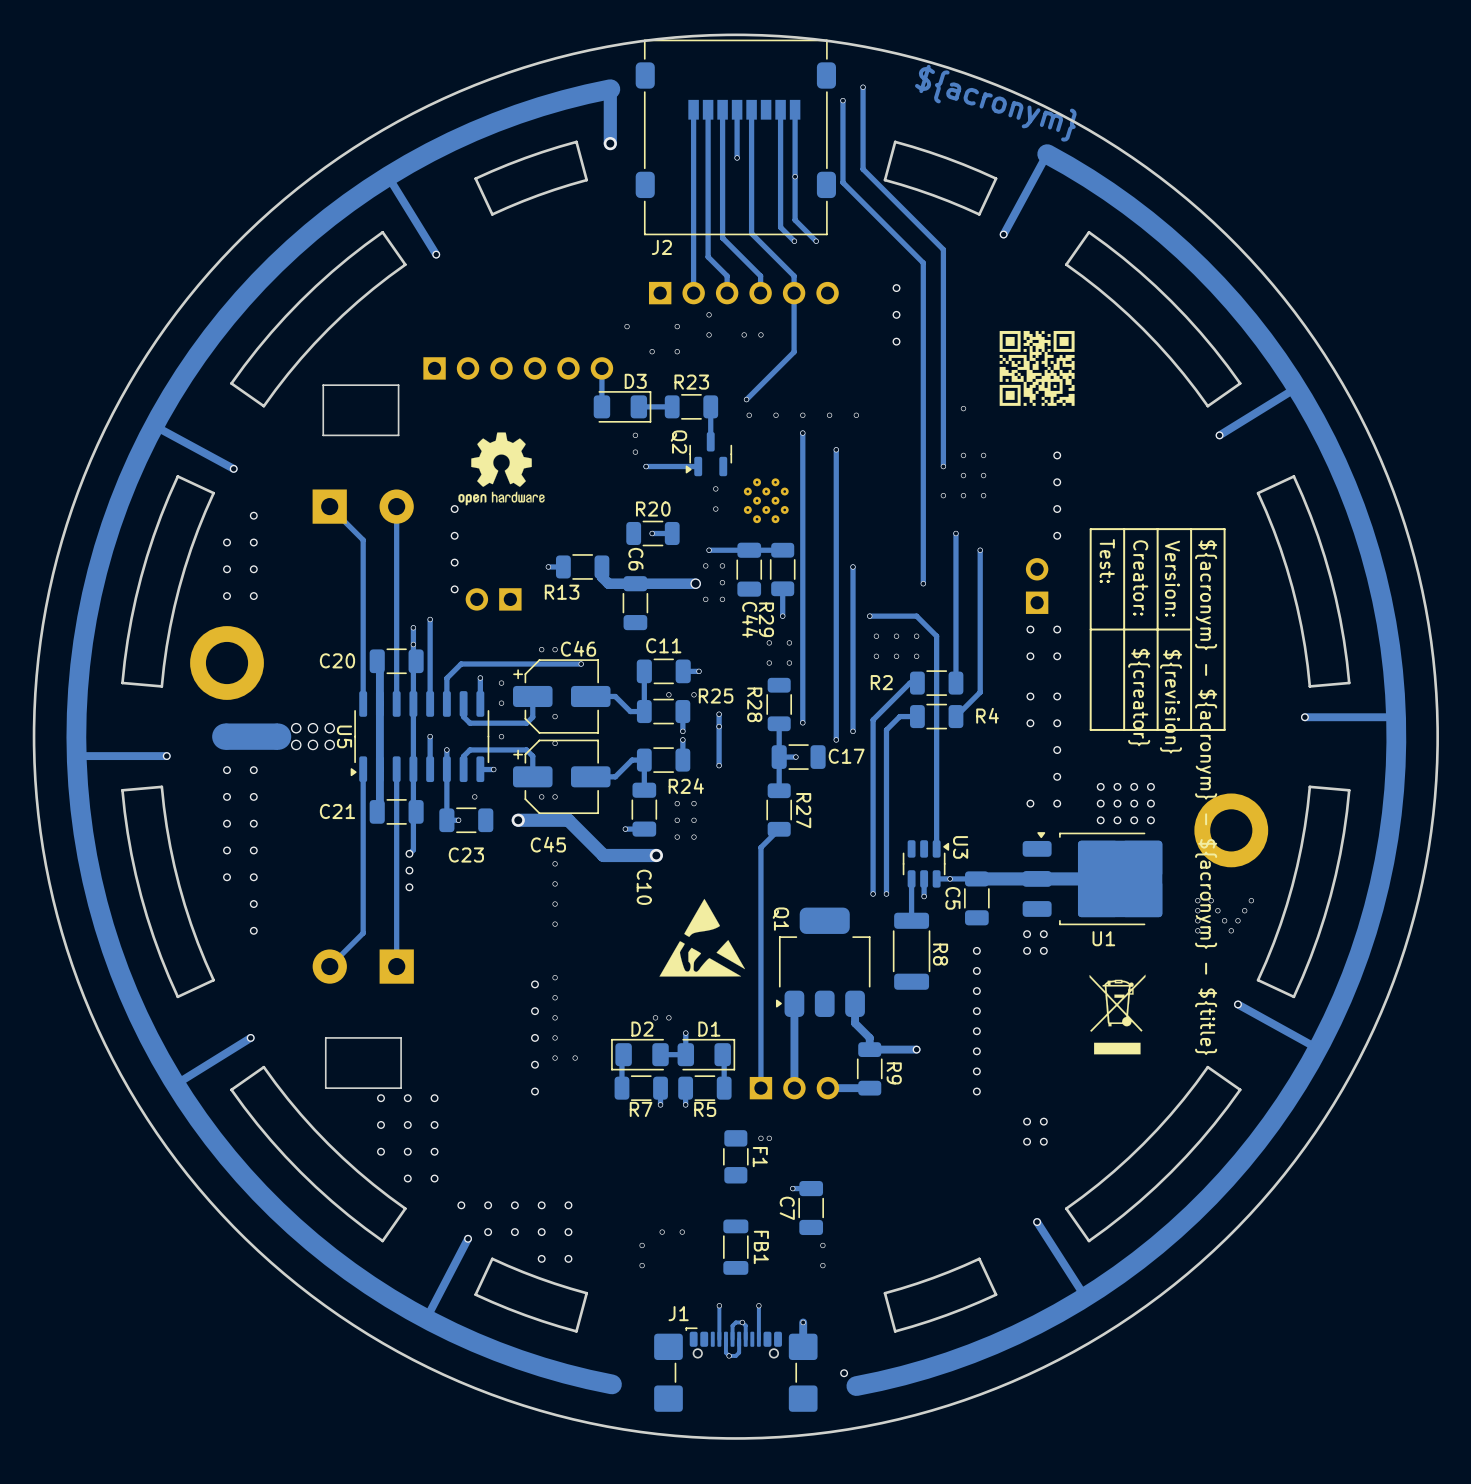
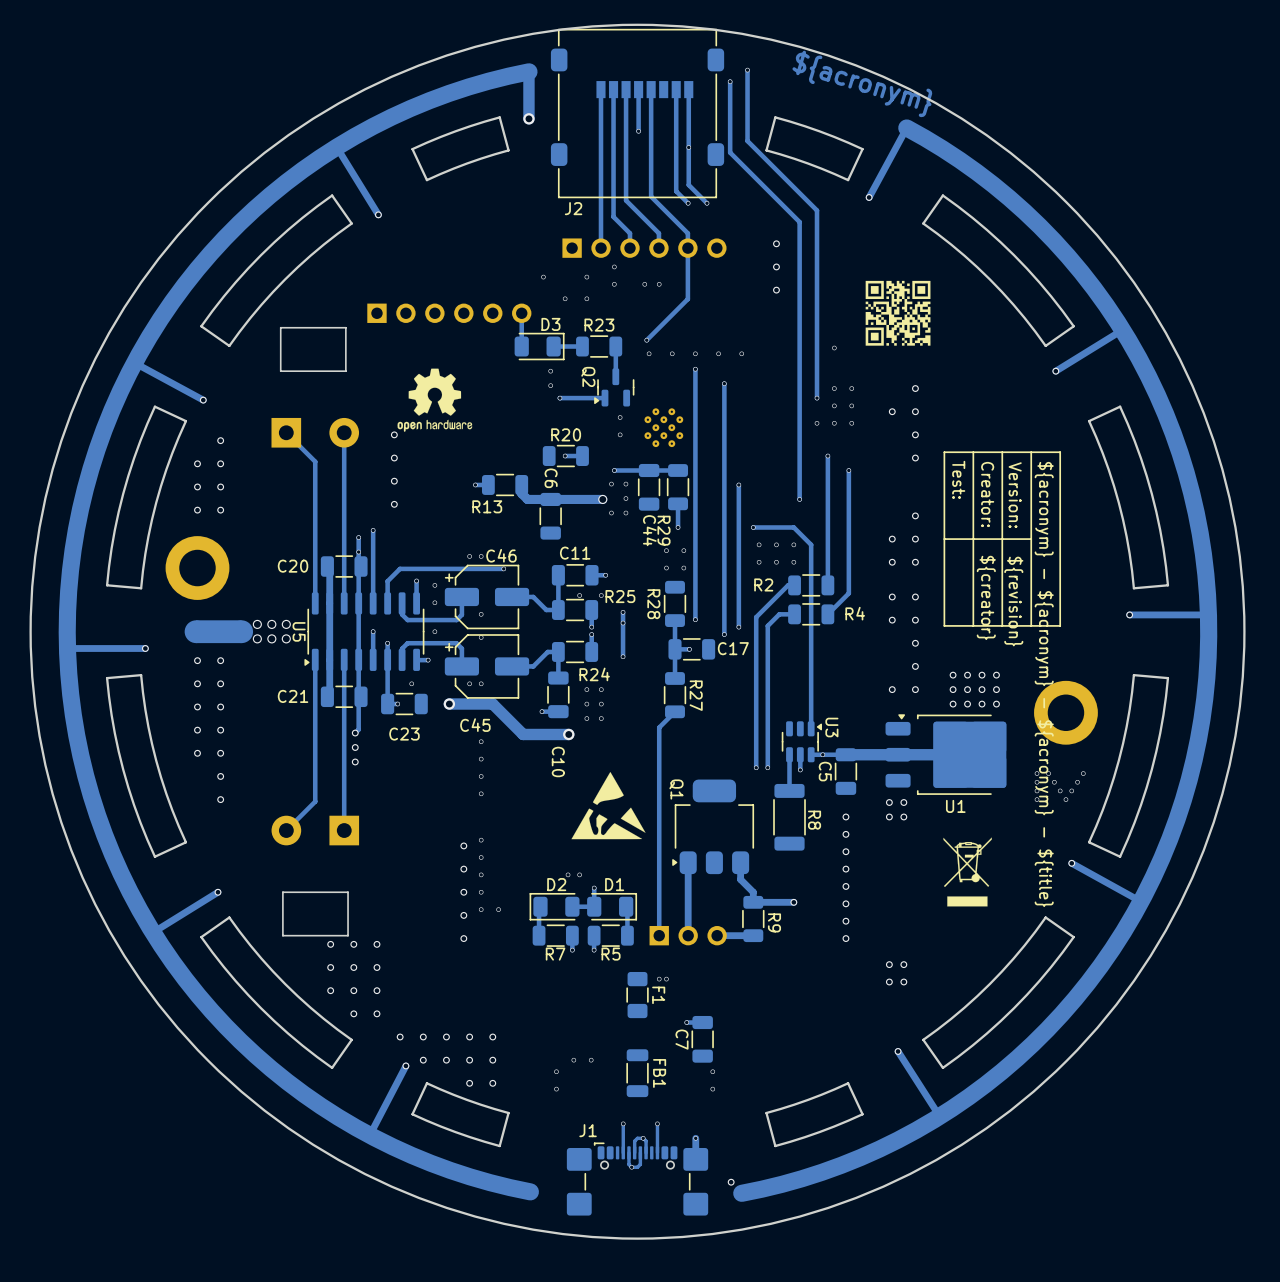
via: none -> (892, 411)
part: (1037, 586) -> none
part: (493, 599) -> none
via: none -> (915, 515)

